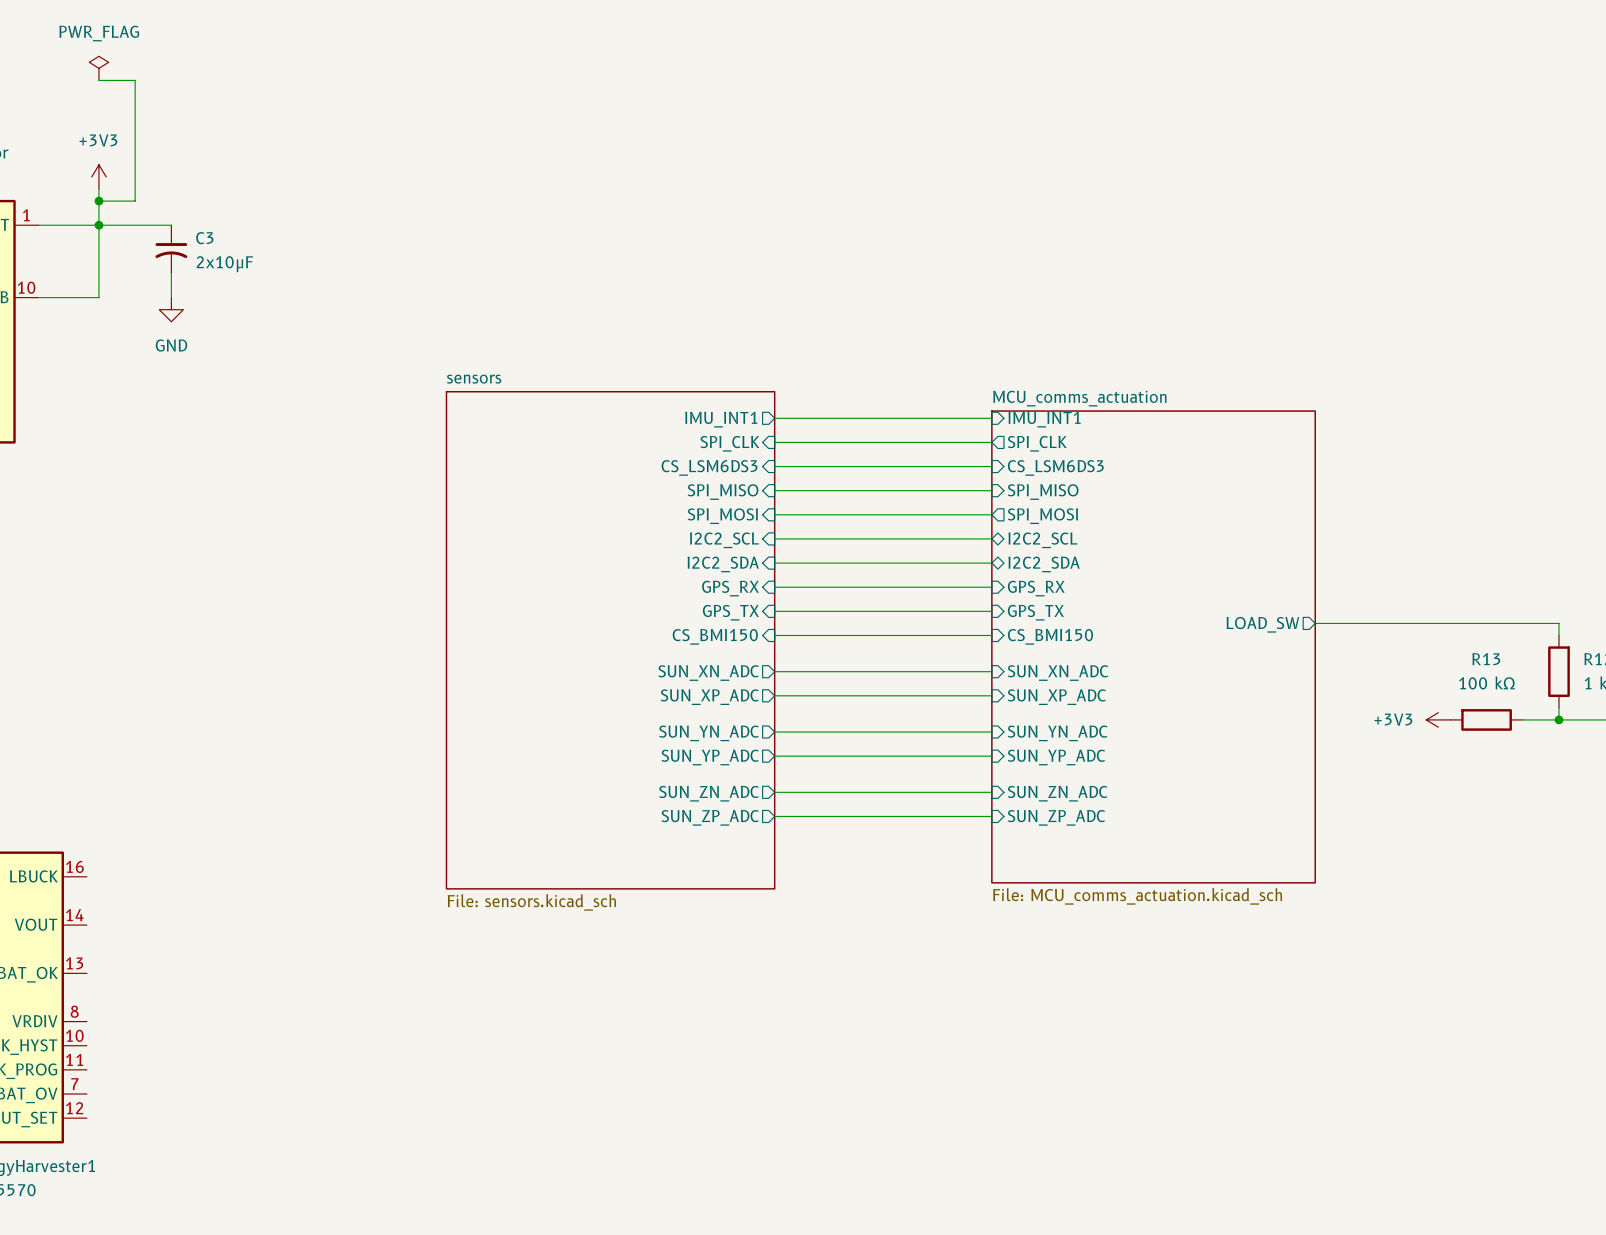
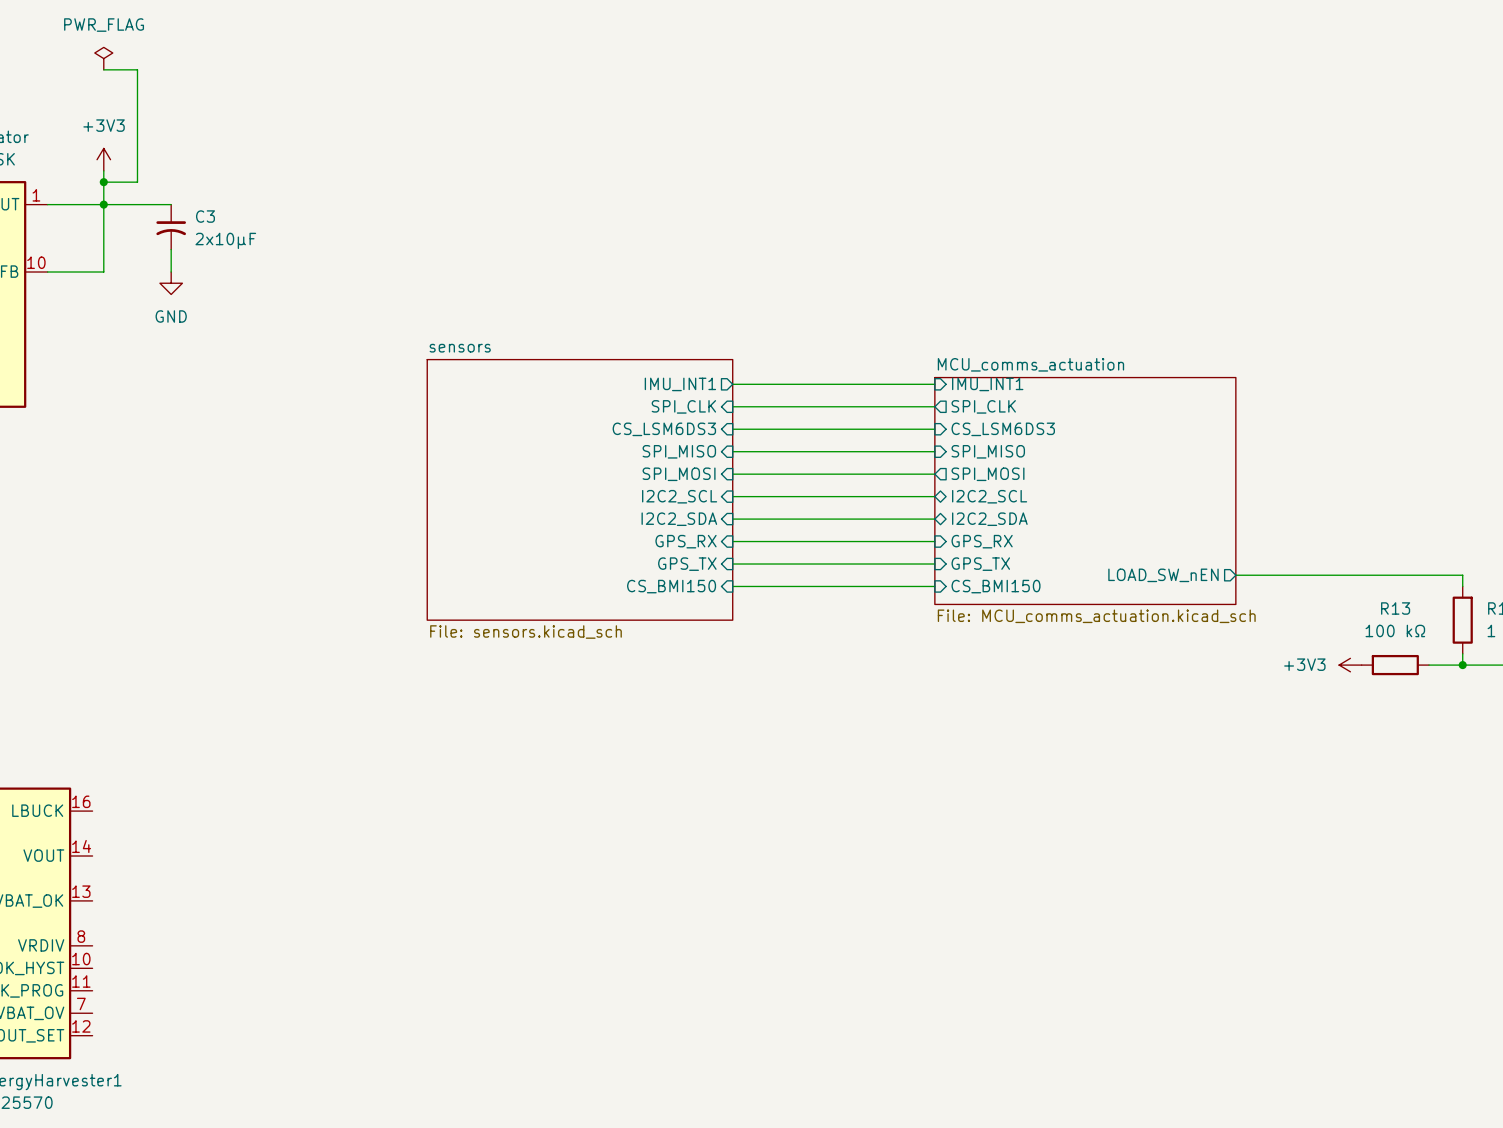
sheet sensors: none -> File: sensors.kicad_sch (579, 489)
sheet MCU_comms_actuation: none -> File: MCU_comms_actuation.kicad_sch (1085, 491)
sheet pin: LOAD_SW (1262, 624) -> LOAD_SW_nEN (1163, 575)
sheet sensors: File: sensors.kicad_sch (610, 640) -> none
sheet MCU_comms_actuation: File: MCU_comms_actuation.kicad_sch (1153, 646) -> none
wire: (774, 671) (991, 671) -> none
sheet pin: SUN_XN_ADC (708, 673) -> none
sheet pin: SUN_XN_ADC (1058, 673) -> none
wire: (774, 695) (991, 695) -> none
sheet pin: SUN_XP_ADC (709, 697) -> none
sheet pin: SUN_XP_ADC (1056, 697) -> none
wire: (774, 732) (991, 732) -> none
sheet pin: SUN_YN_ADC (708, 733) -> none
sheet pin: SUN_YN_ADC (1057, 733) -> none
wire: (774, 756) (991, 756) -> none
sheet pin: SUN_YP_ADC (710, 757) -> none
sheet pin: SUN_YP_ADC (1056, 757) -> none
wire: (774, 792) (991, 792) -> none
sheet pin: SUN_ZN_ADC (708, 793) -> none
sheet pin: SUN_ZN_ADC (1057, 793) -> none
wire: (774, 816) (991, 816) -> none
sheet pin: SUN_ZP_ADC (710, 817) -> none
sheet pin: SUN_ZP_ADC (1056, 817) -> none

